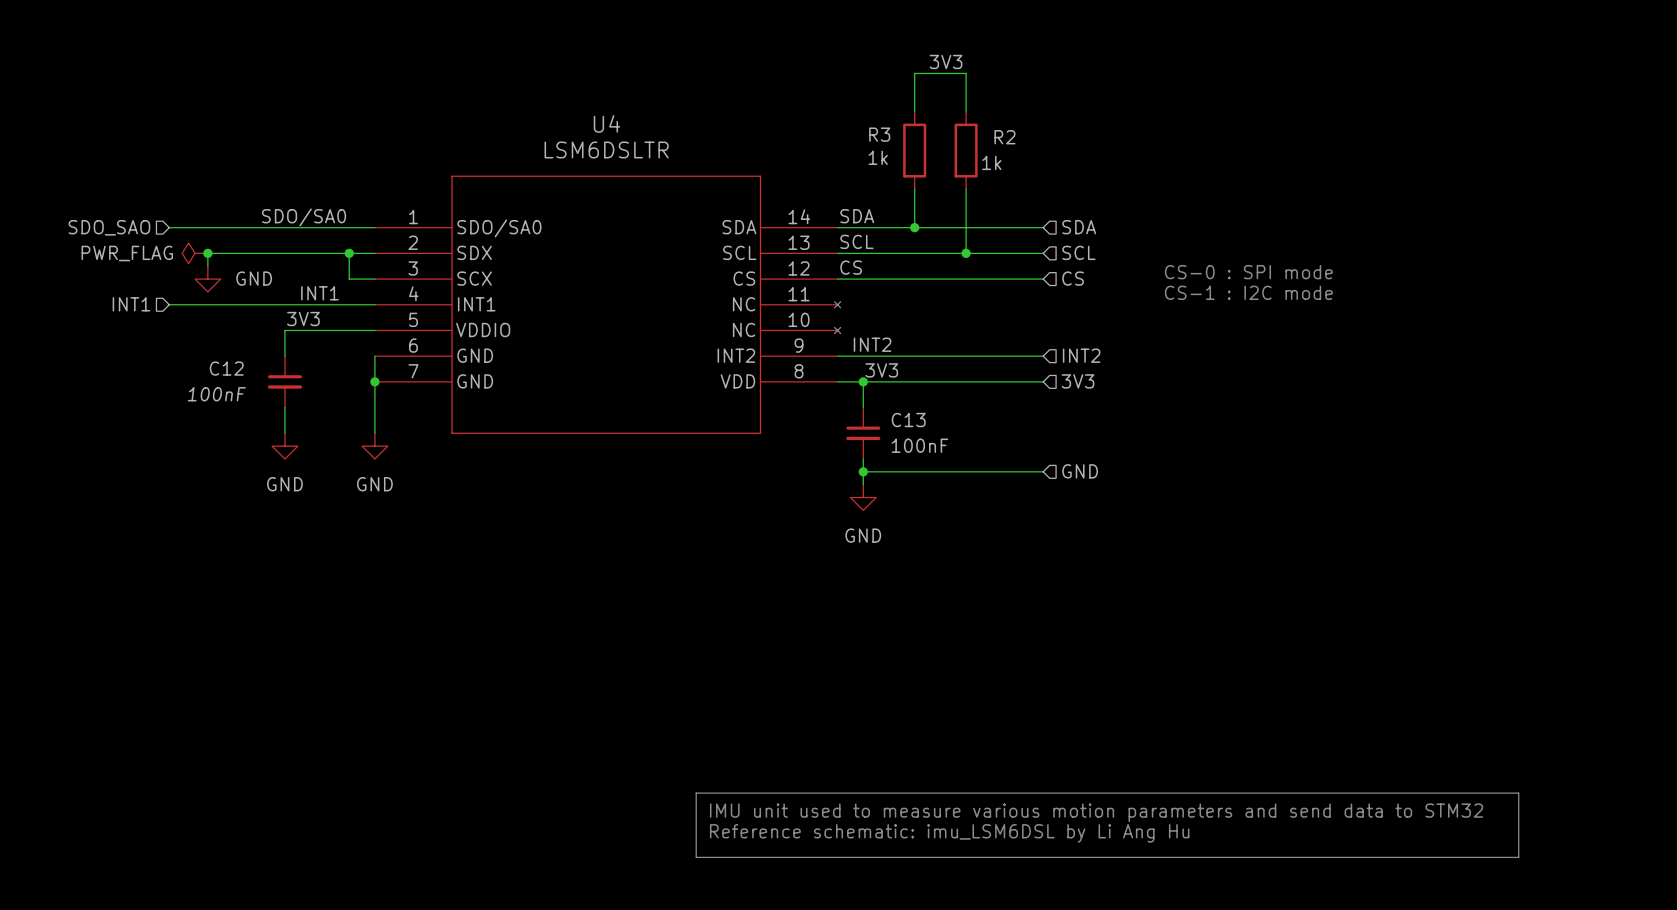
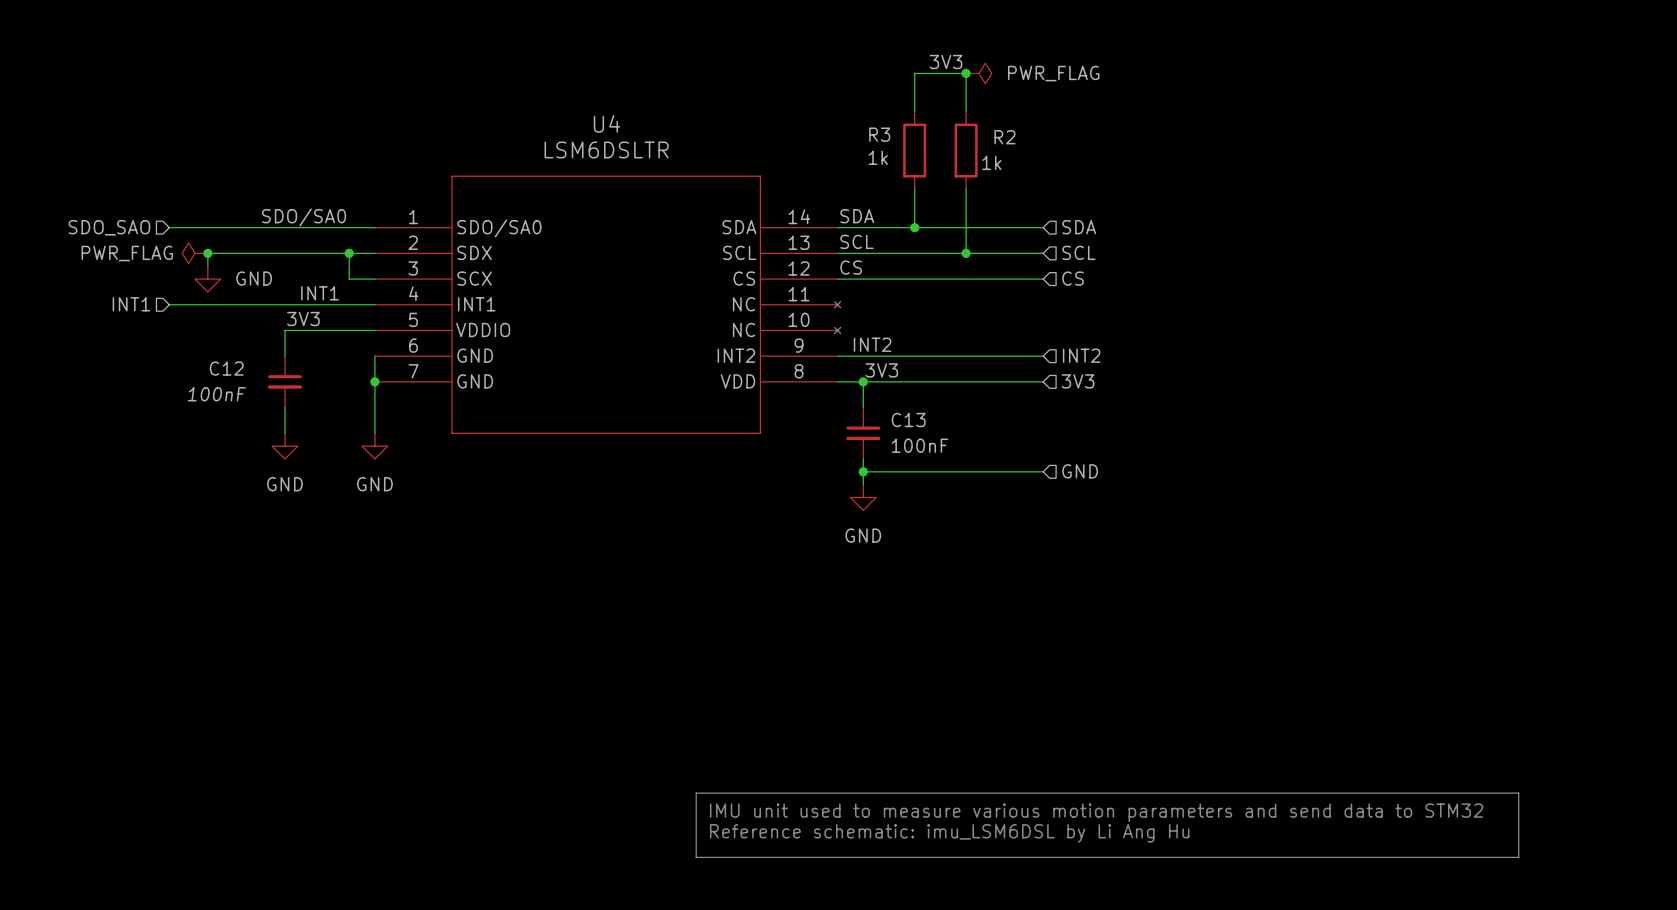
junction: none -> (966, 73)
power symbol: none -> PWR_FLAG (978, 73)
text: CS-0 : SPI mode (1248, 272) -> none
text: CS-1 : I2C mode (1248, 292) -> none

